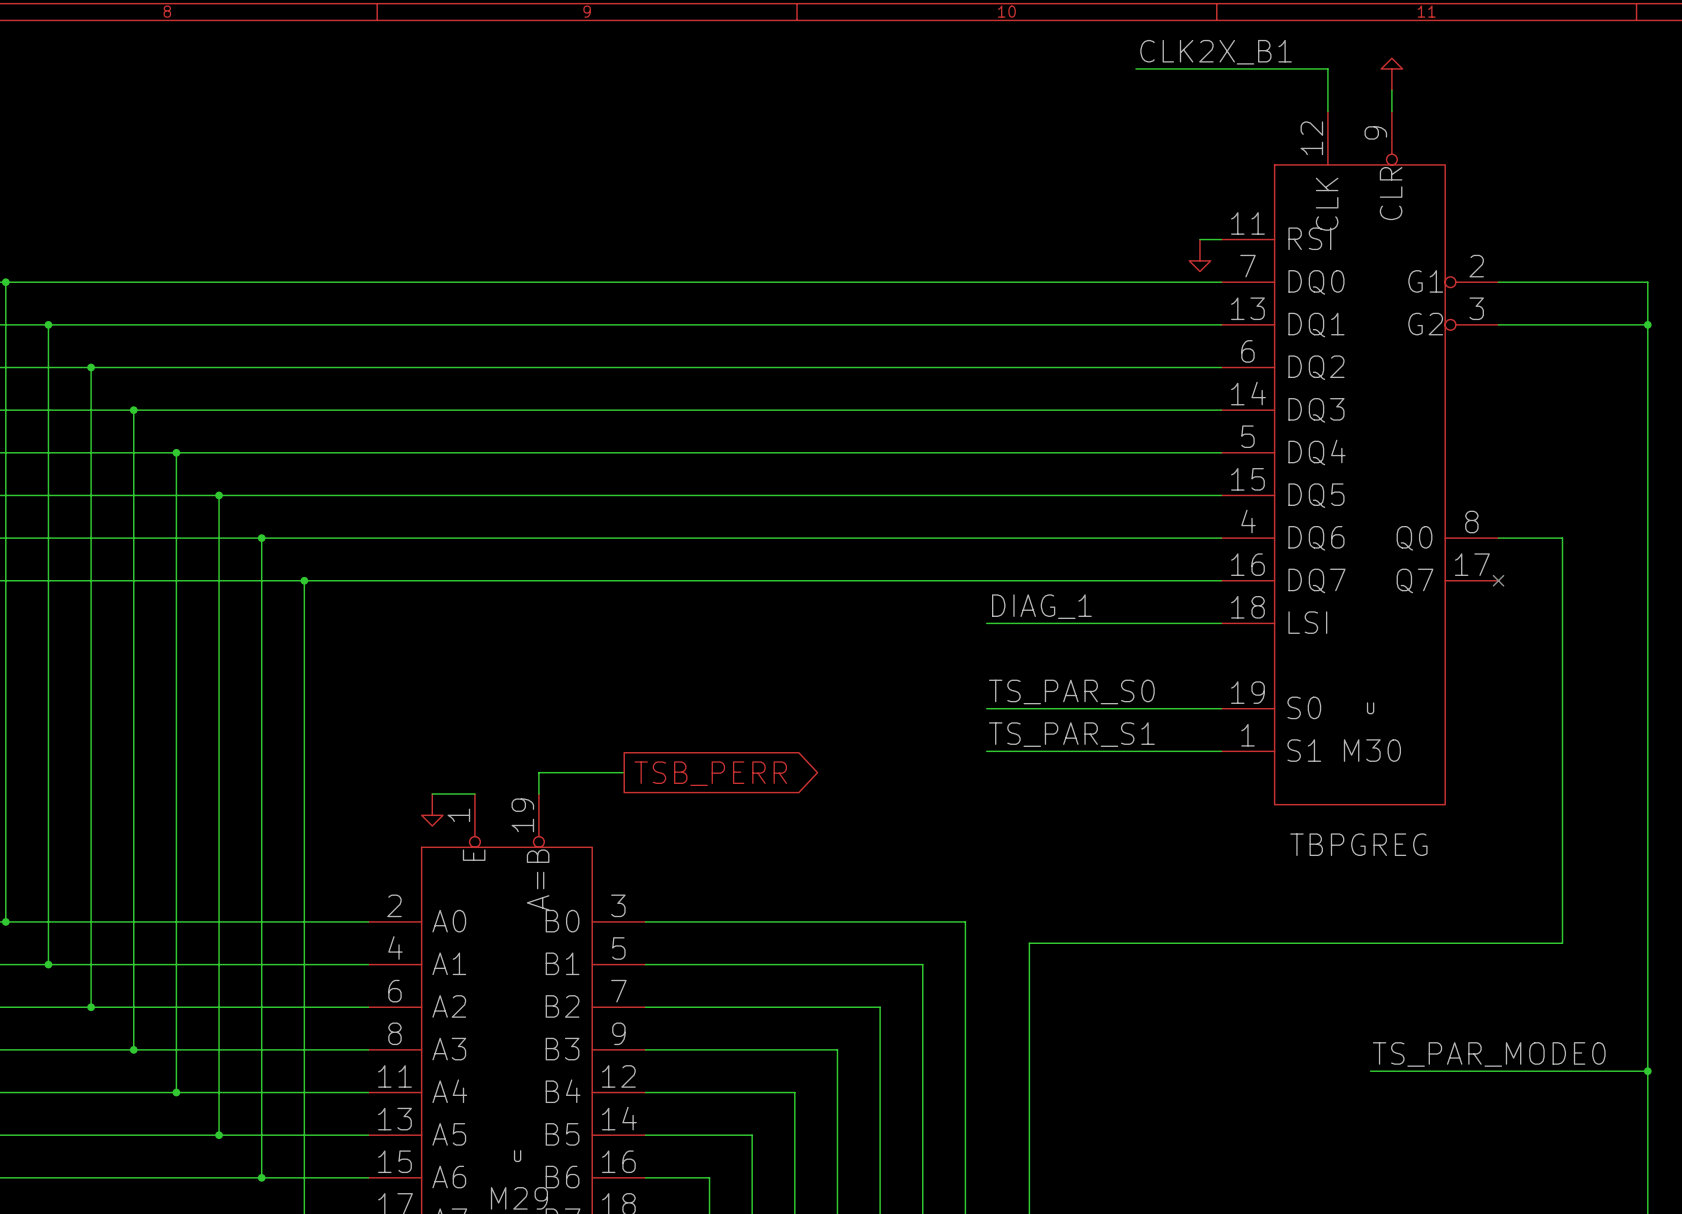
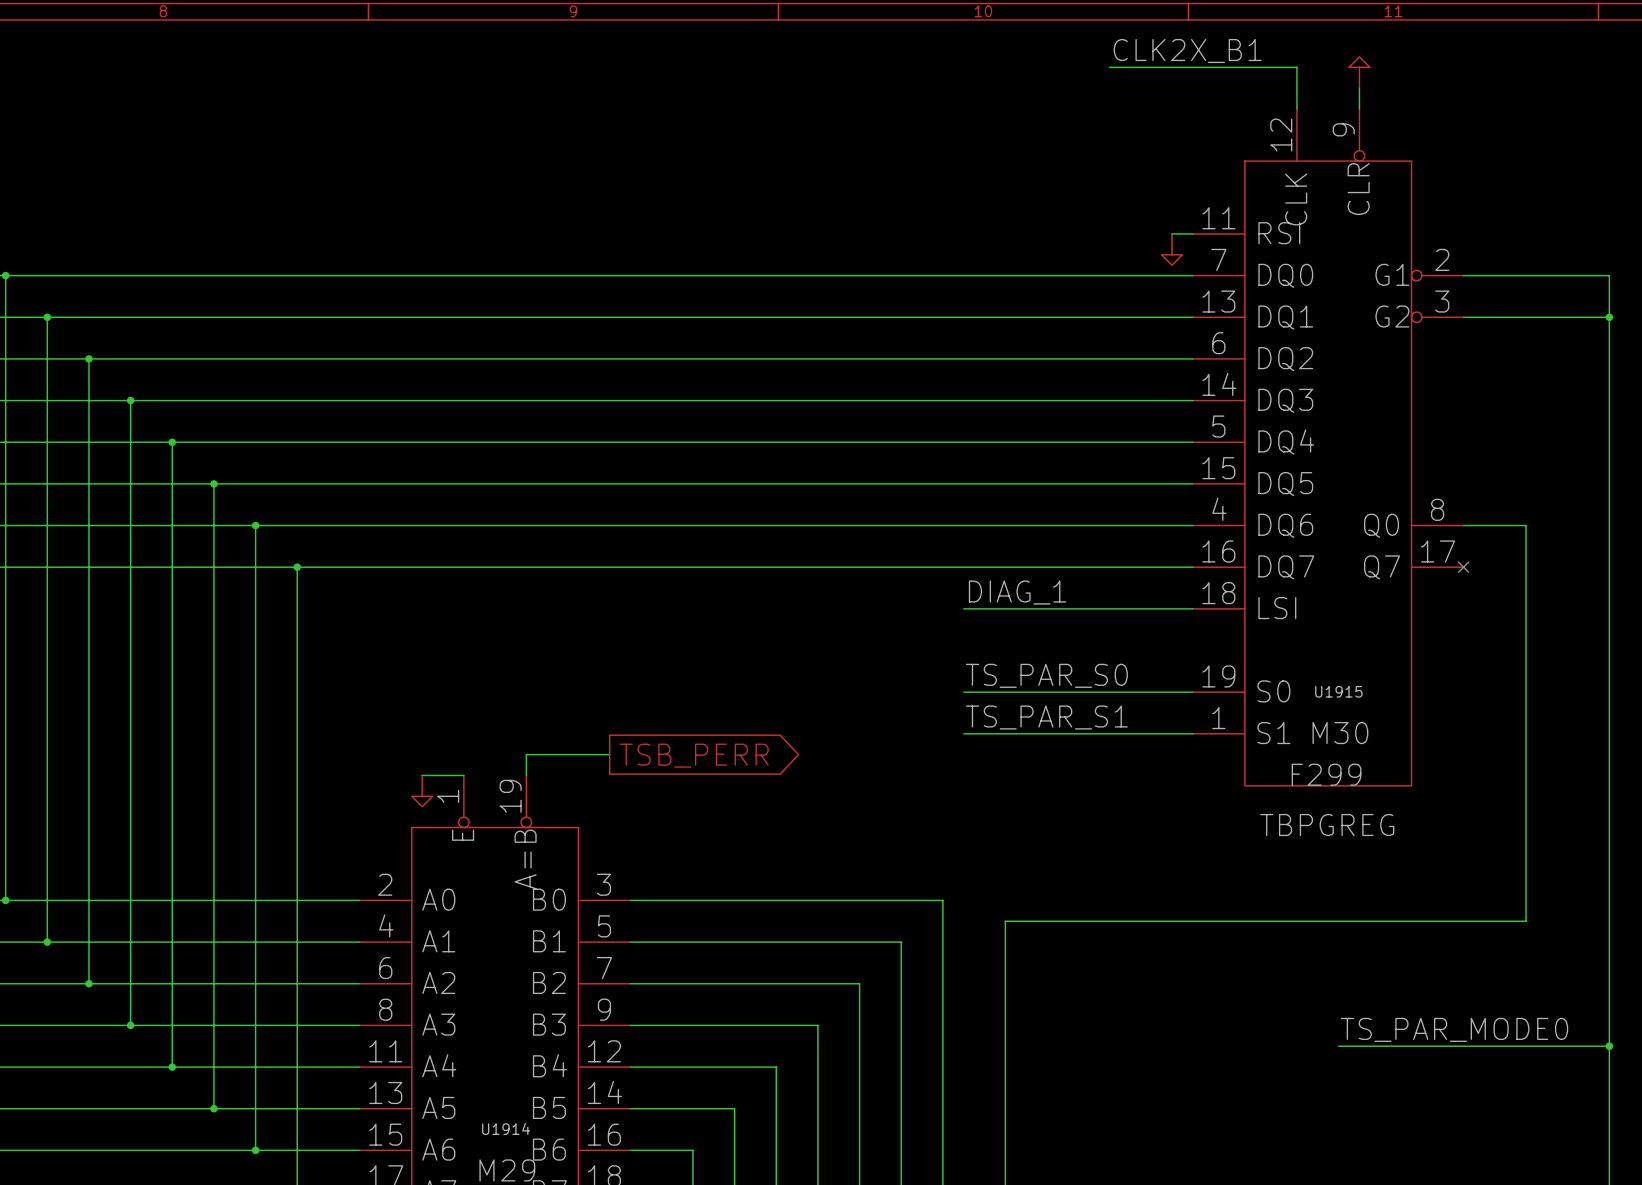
U name: U (1370, 708) -> U1915 (1338, 691)
U value: none -> F299 (1326, 774)
U name: U (517, 1156) -> U1914 (506, 1128)

